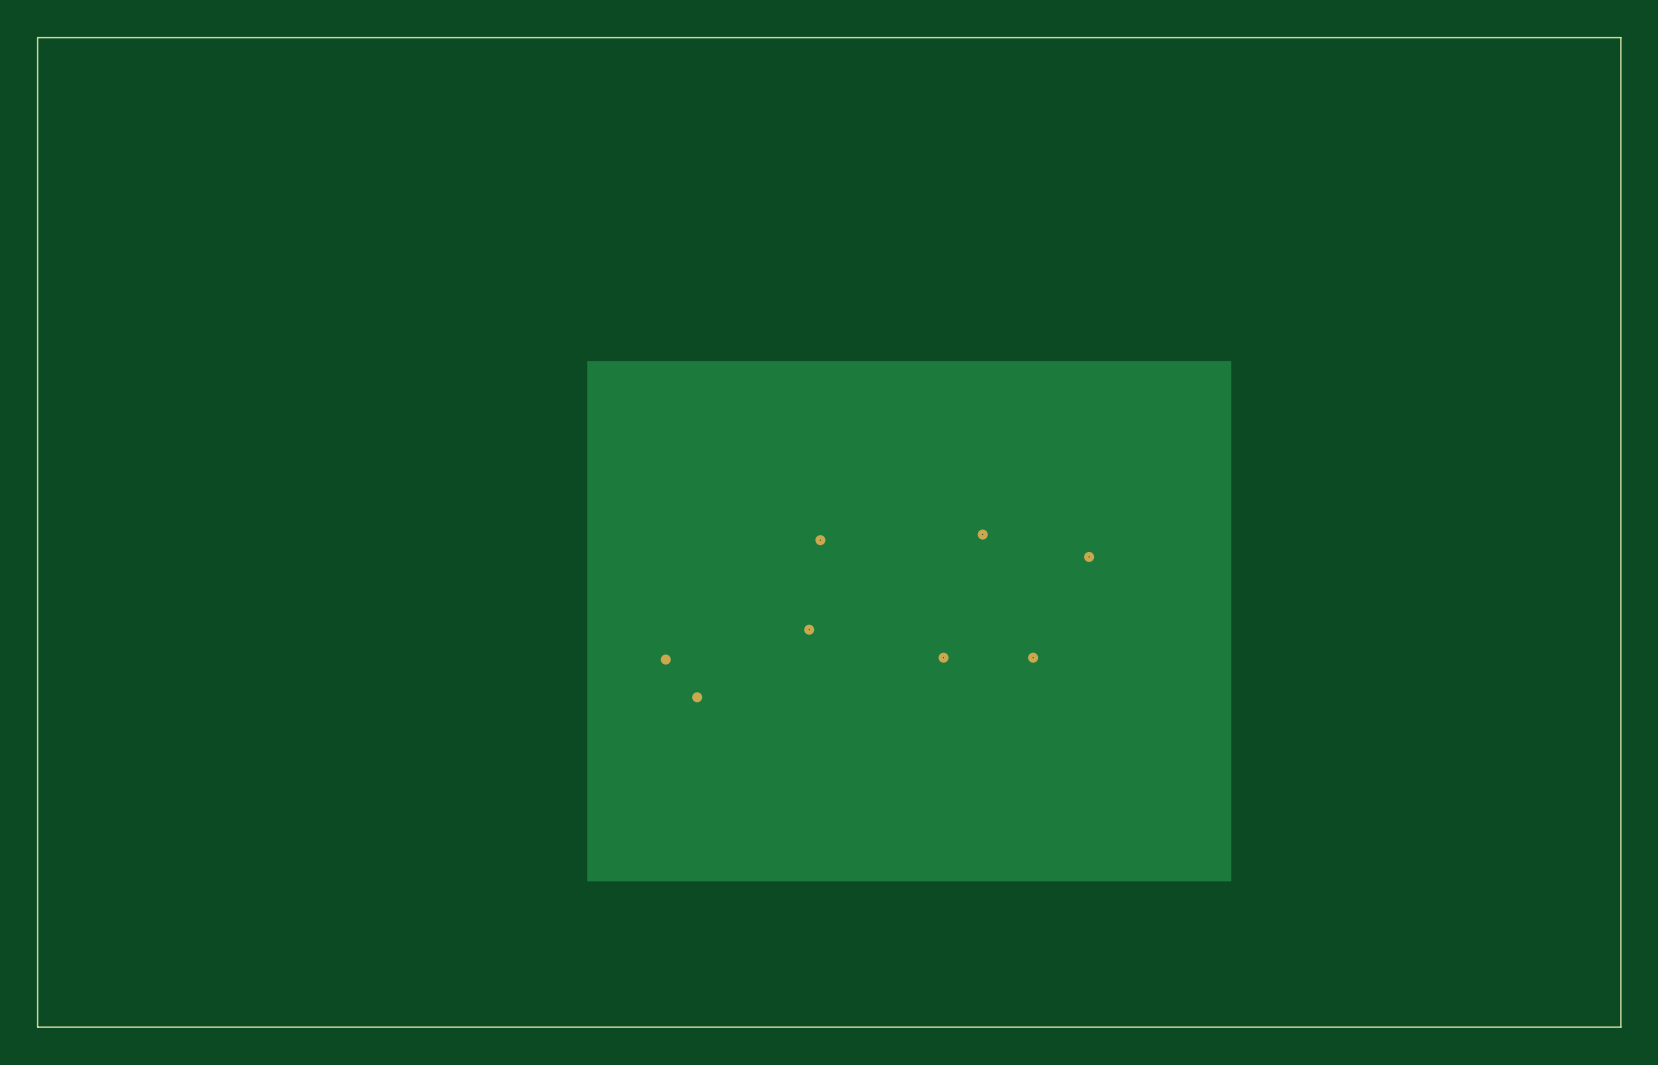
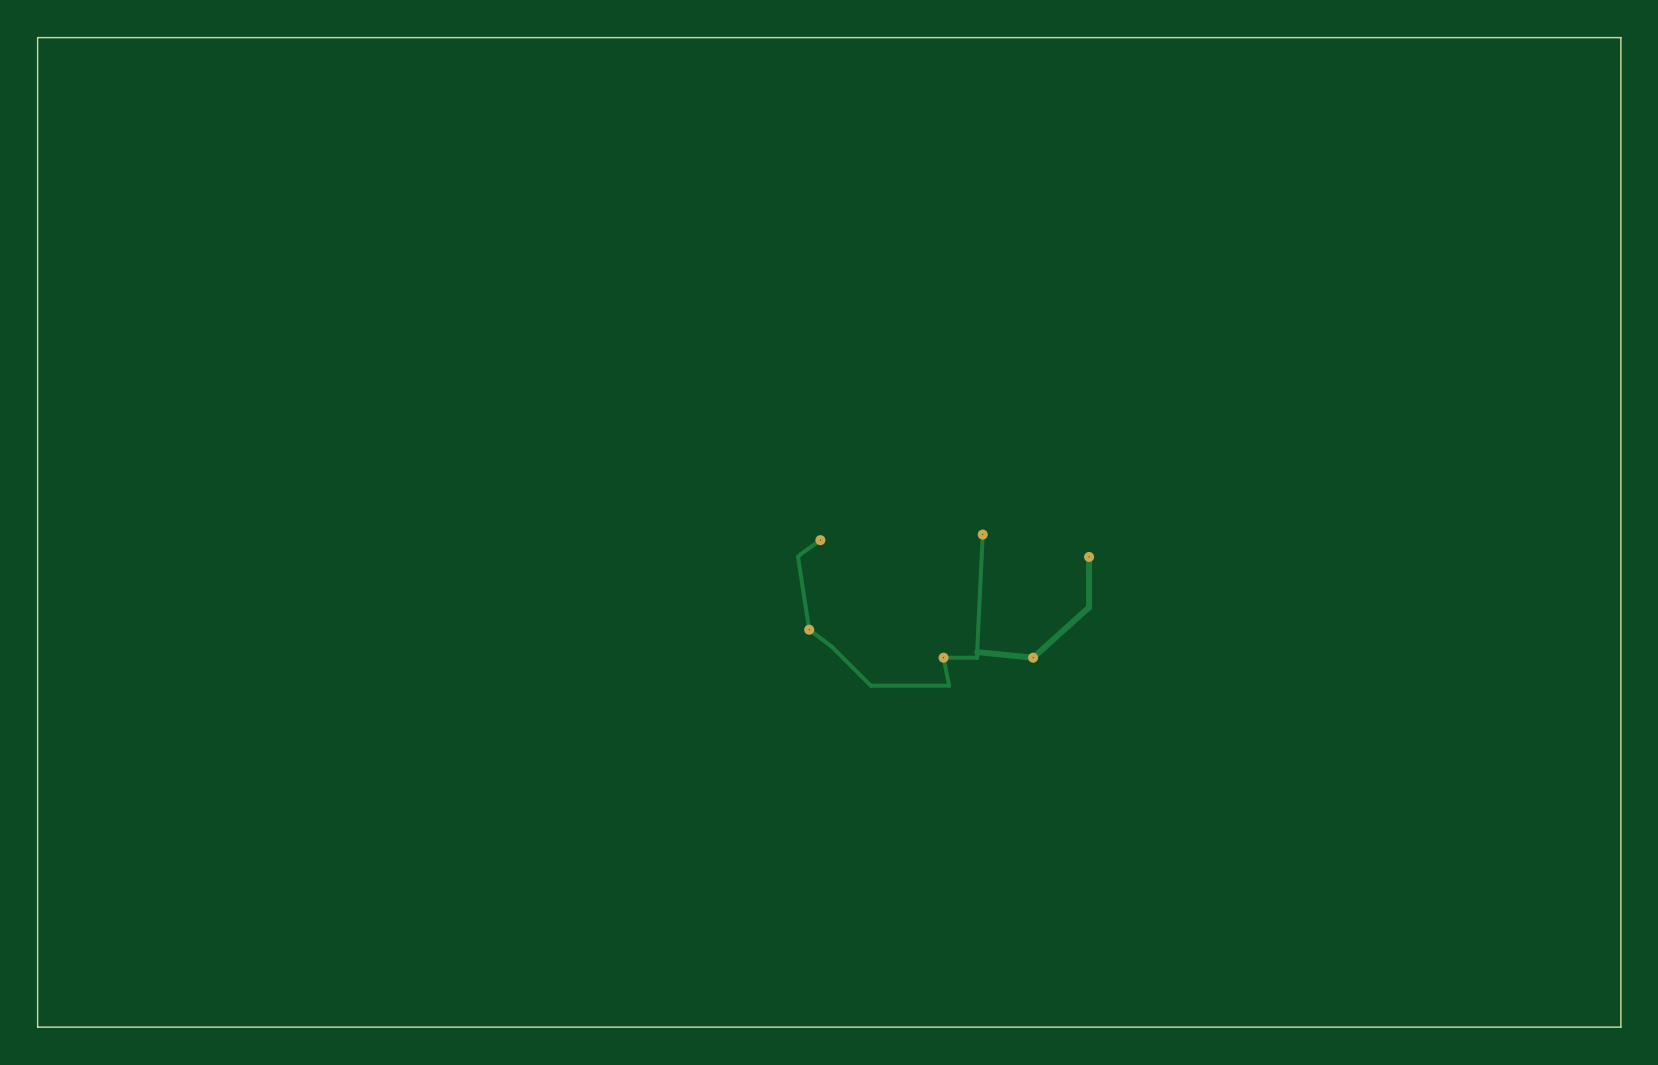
drawing: [587, 361, 1232, 882] -> none
via: (665, 659) -> none
via: (697, 697) -> none

